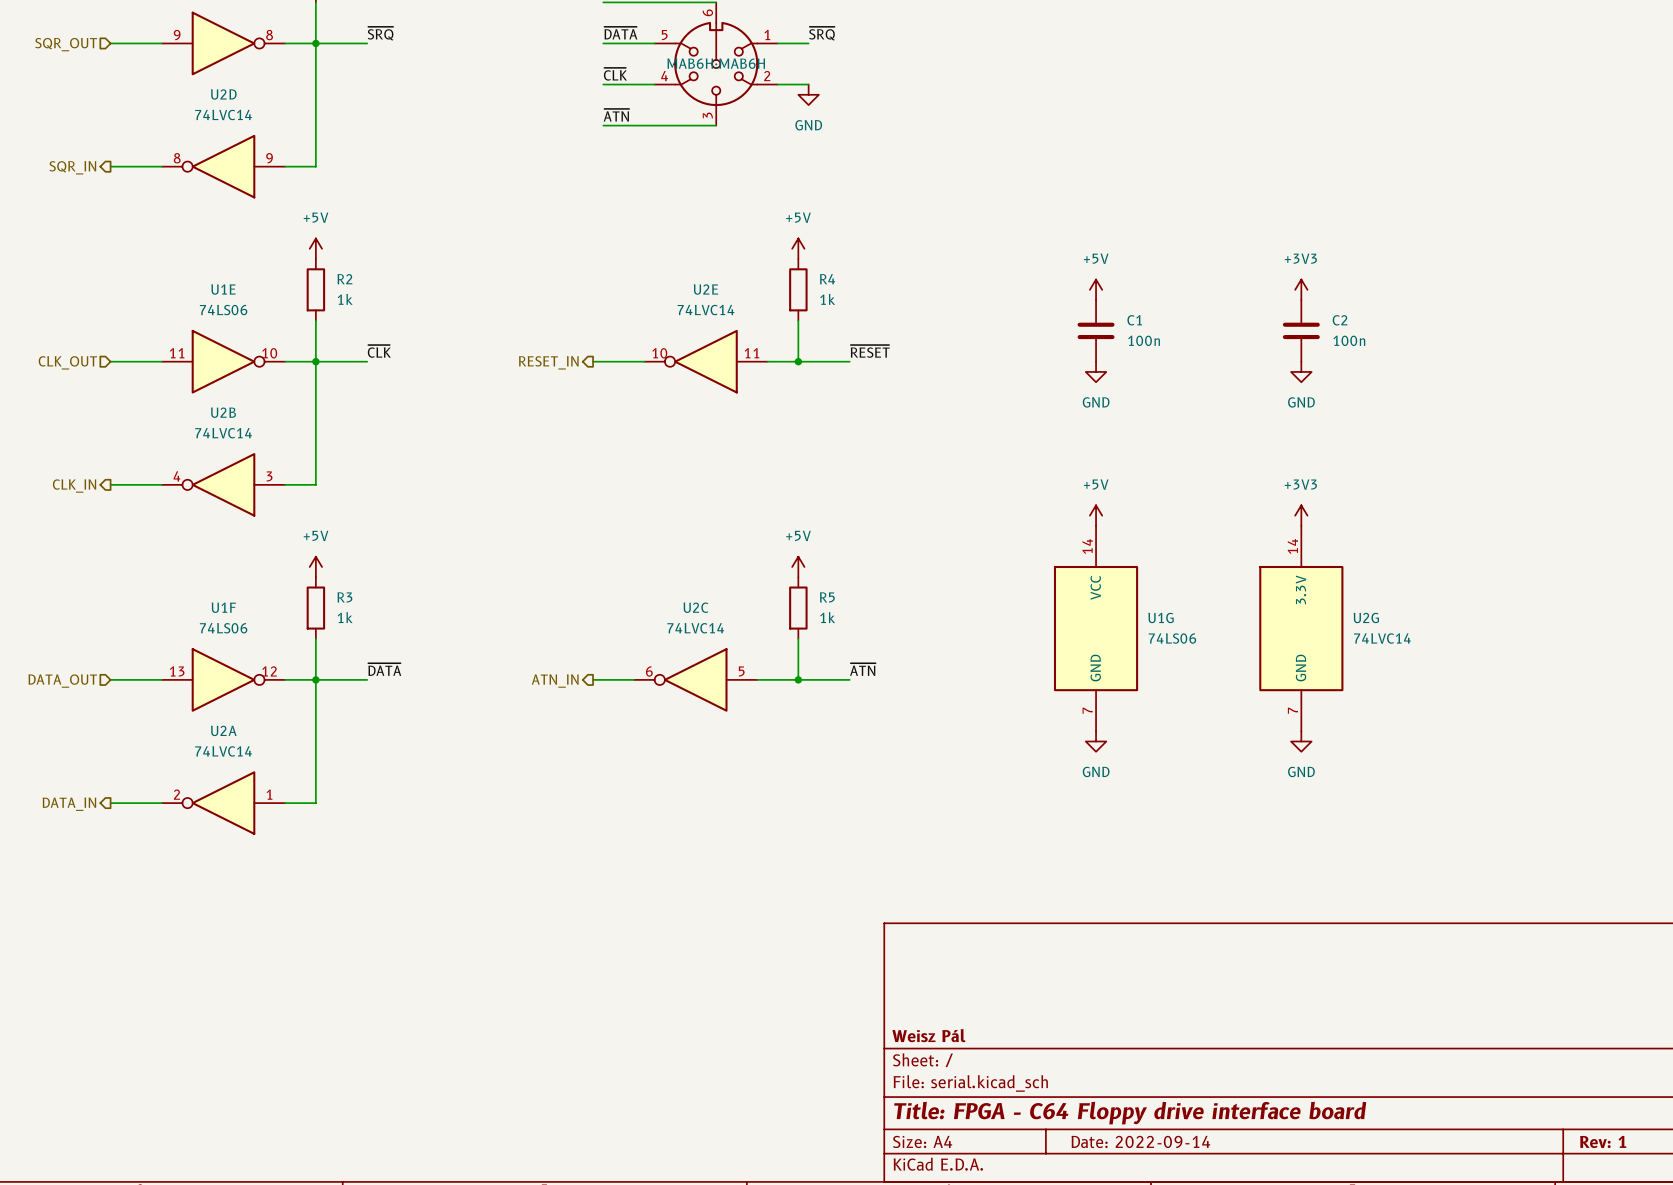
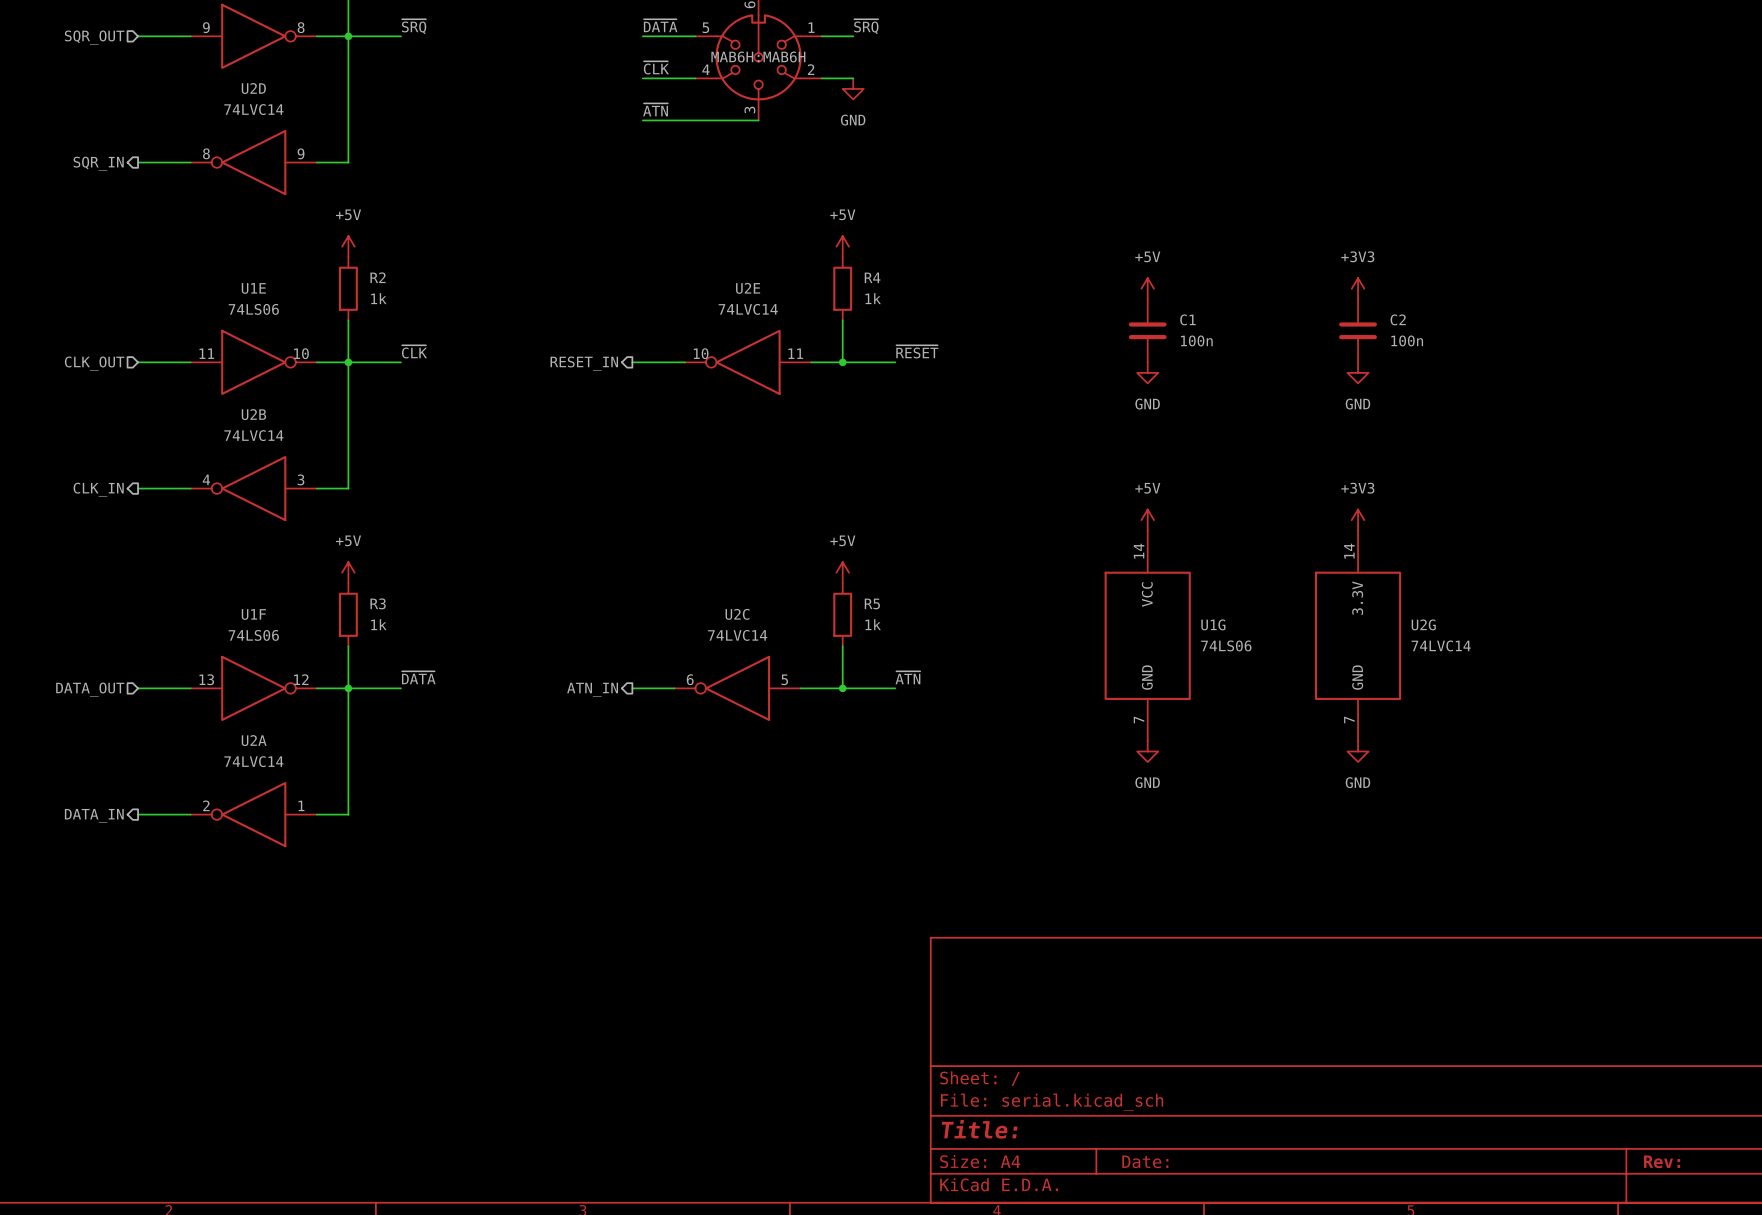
title block: Weisz Pál (928, 1035) -> none
title block: Title: FPGA - C64 Floppy drive interface board (1130, 1113) -> Title: (979, 1129)
title block: Date: 2022-09-14 (1140, 1141) -> Date: (1145, 1161)
title block: Rev: 1 (1603, 1141) -> Rev: (1662, 1161)

